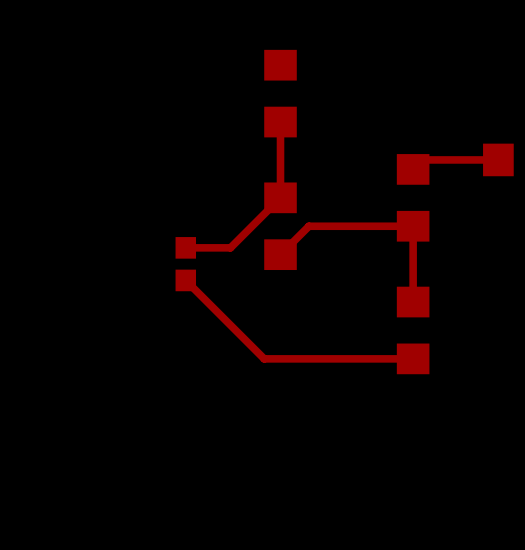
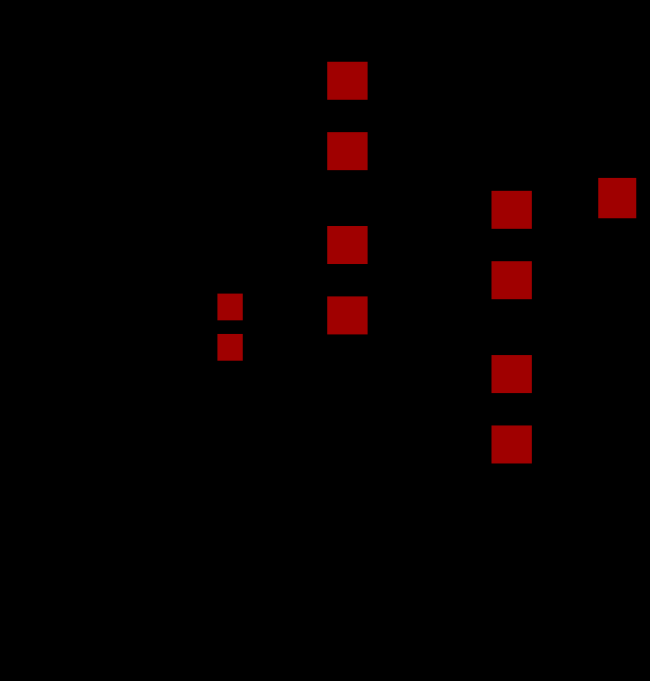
top track: (280, 122) (280, 197) (230, 247) (185, 247) -> none
top track: (498, 159) (422, 159) (413, 169) -> none
top track: (280, 254) (308, 226) (413, 226) (413, 302) -> none
top track: (185, 280) (264, 358) (413, 358) -> none

